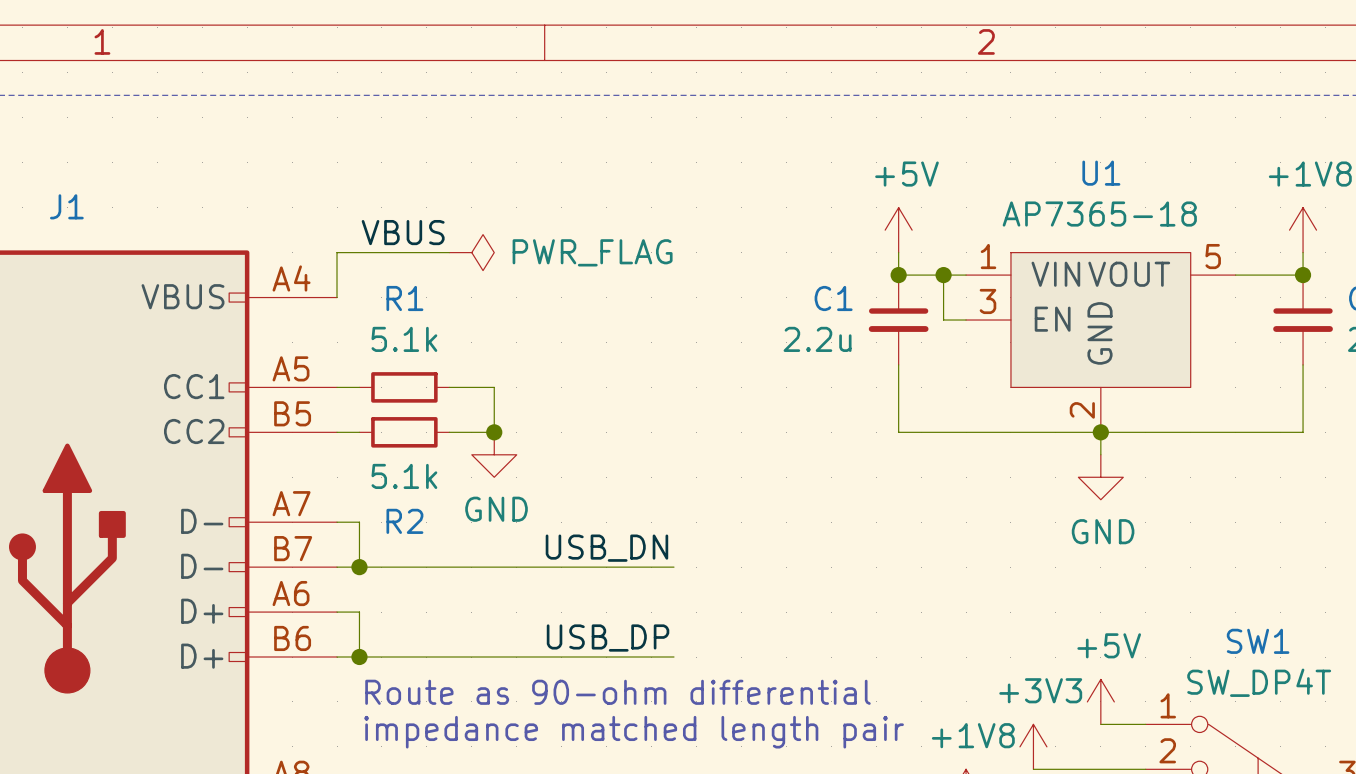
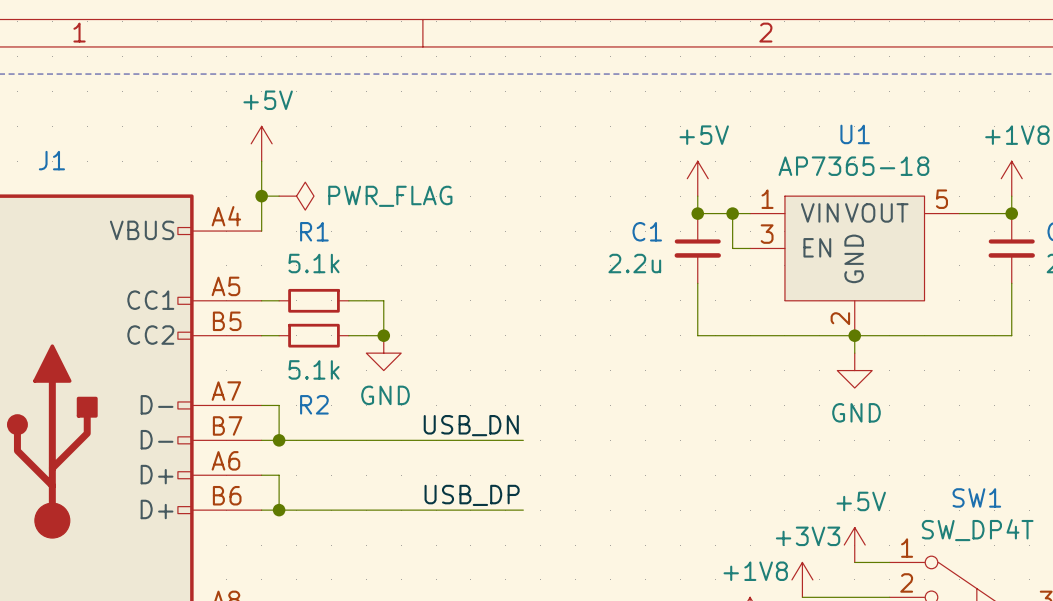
power symbol: none -> +5V (261, 143)
wire: none -> (261, 161) (261, 196)
label: VBUS (403, 232) -> none
junction: none -> (261, 196)
wire: (359, 252) (449, 252) -> none
power symbol position: PWR_FLAG (471, 252) -> PWR_FLAG (296, 196)
text: Route as 90-ohm differential (617, 692) -> none
text: impedance matched length pair (634, 732) -> none

